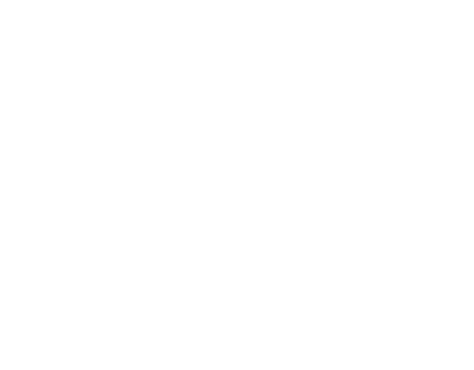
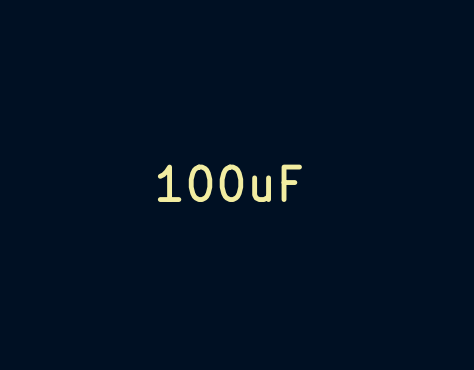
text: none -> 100uF (229, 183)

